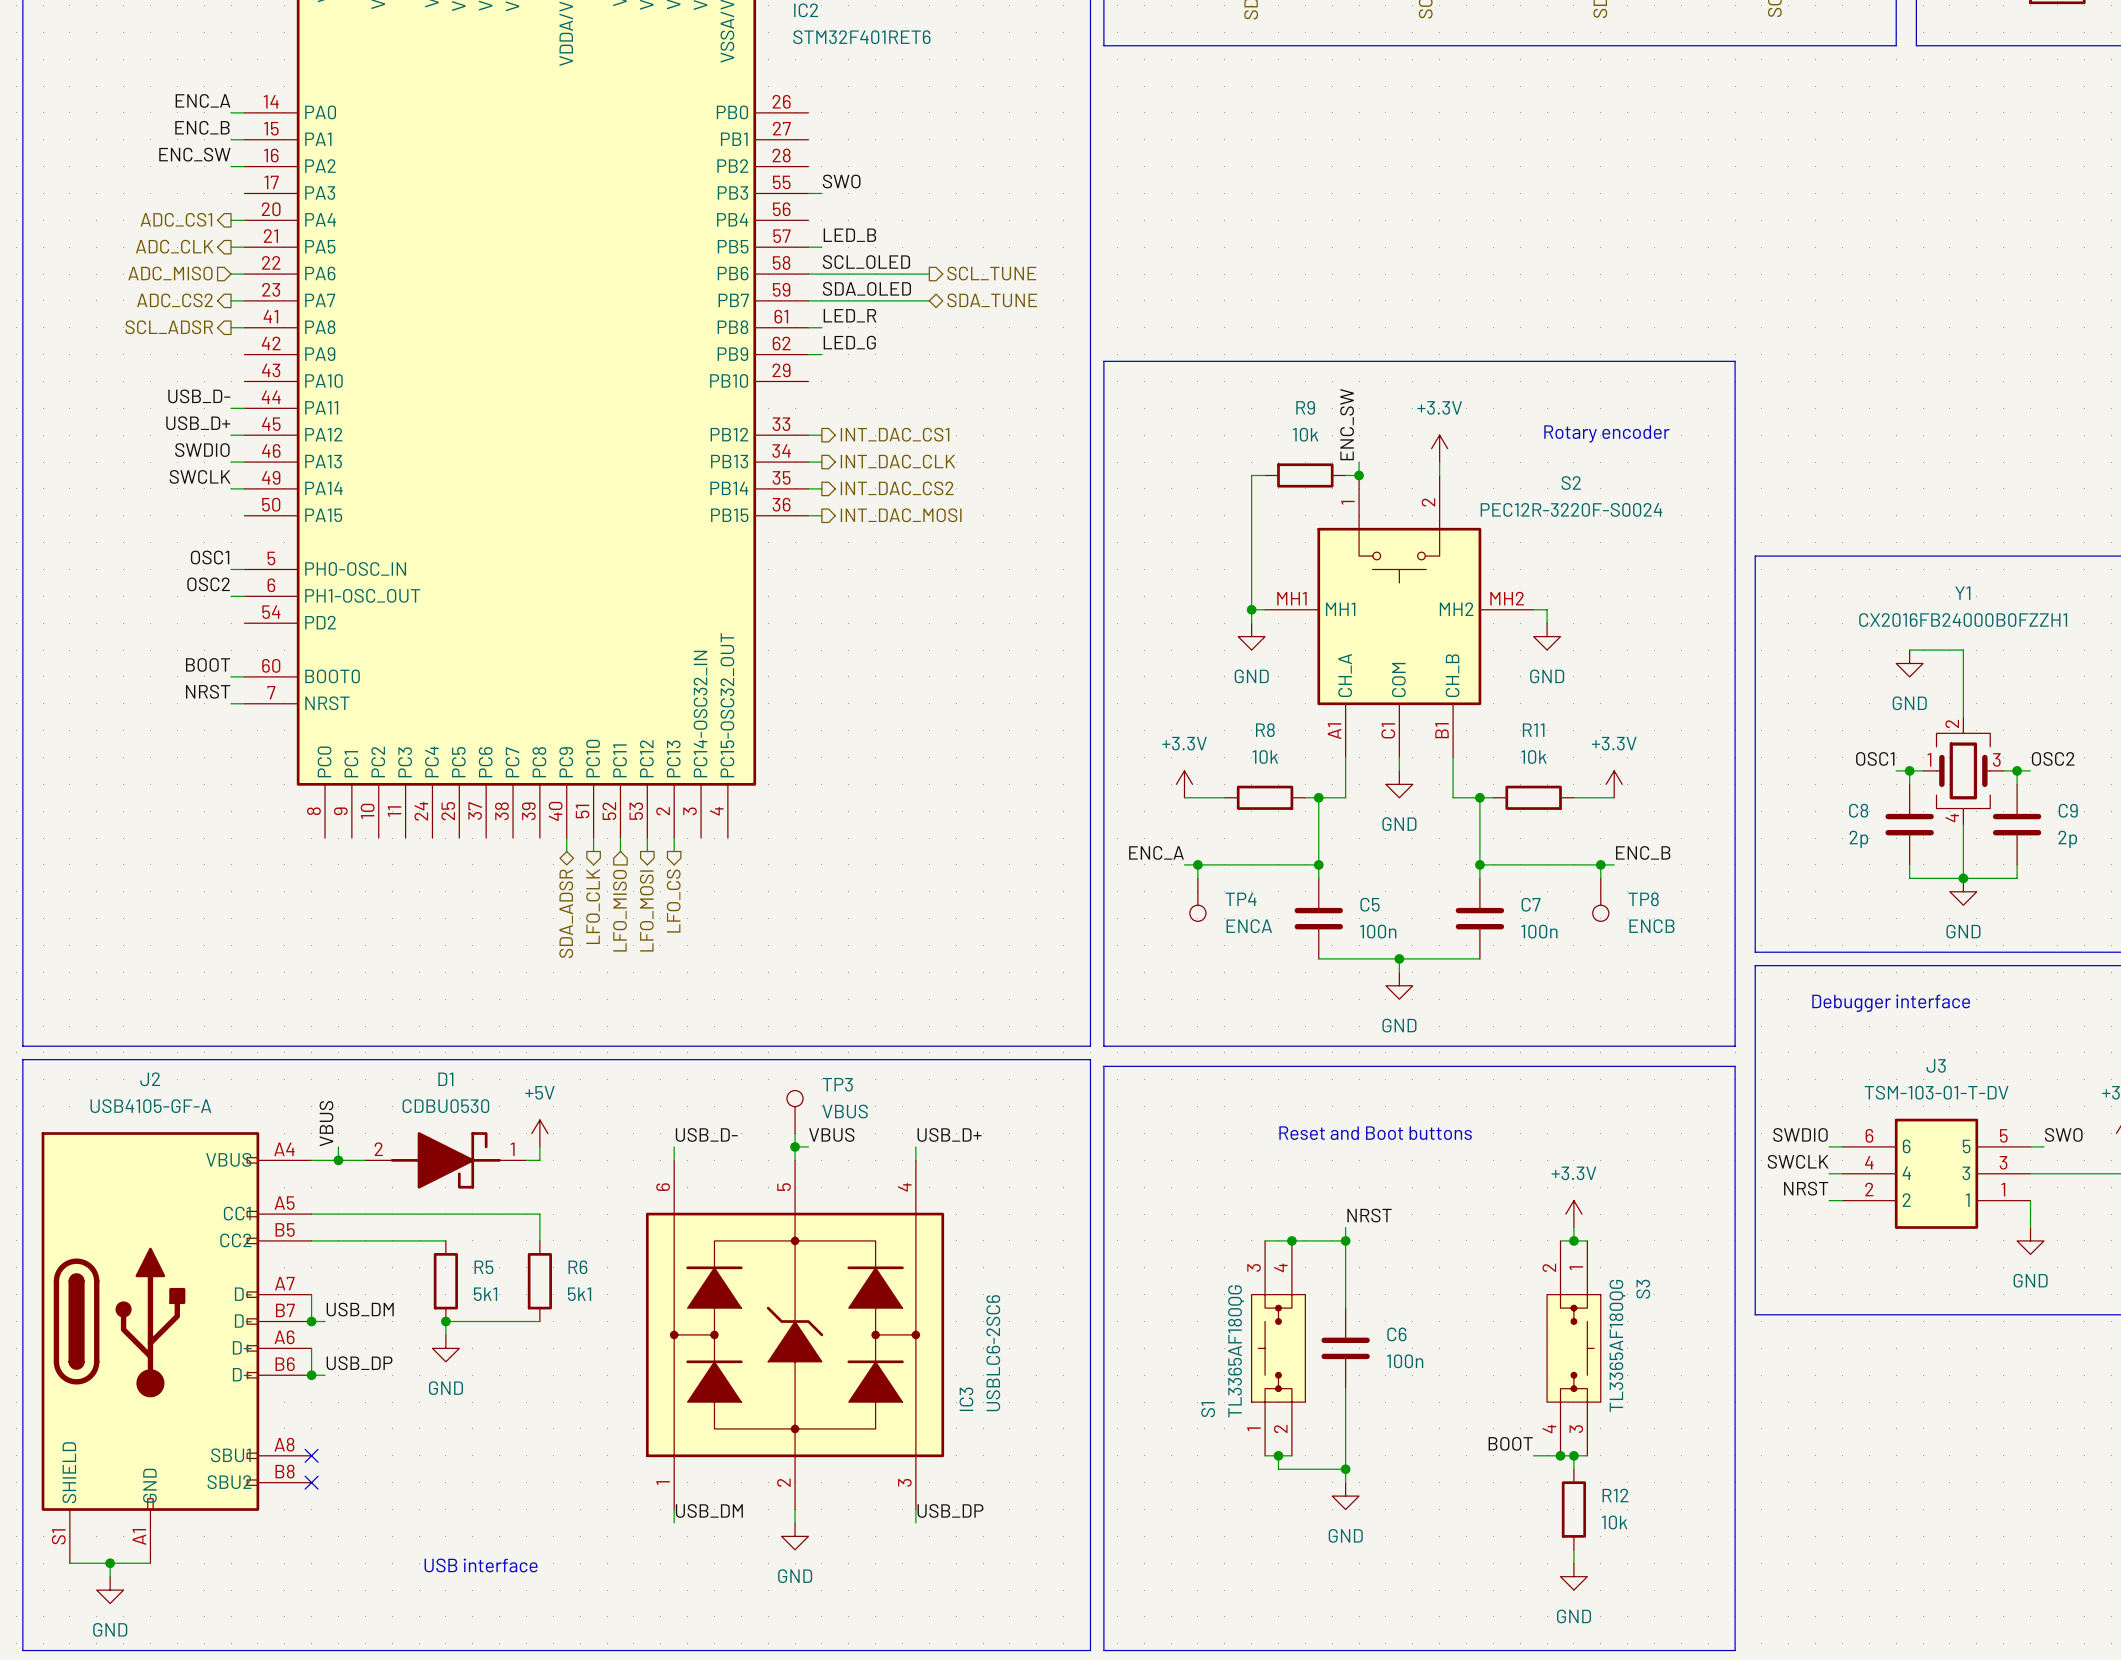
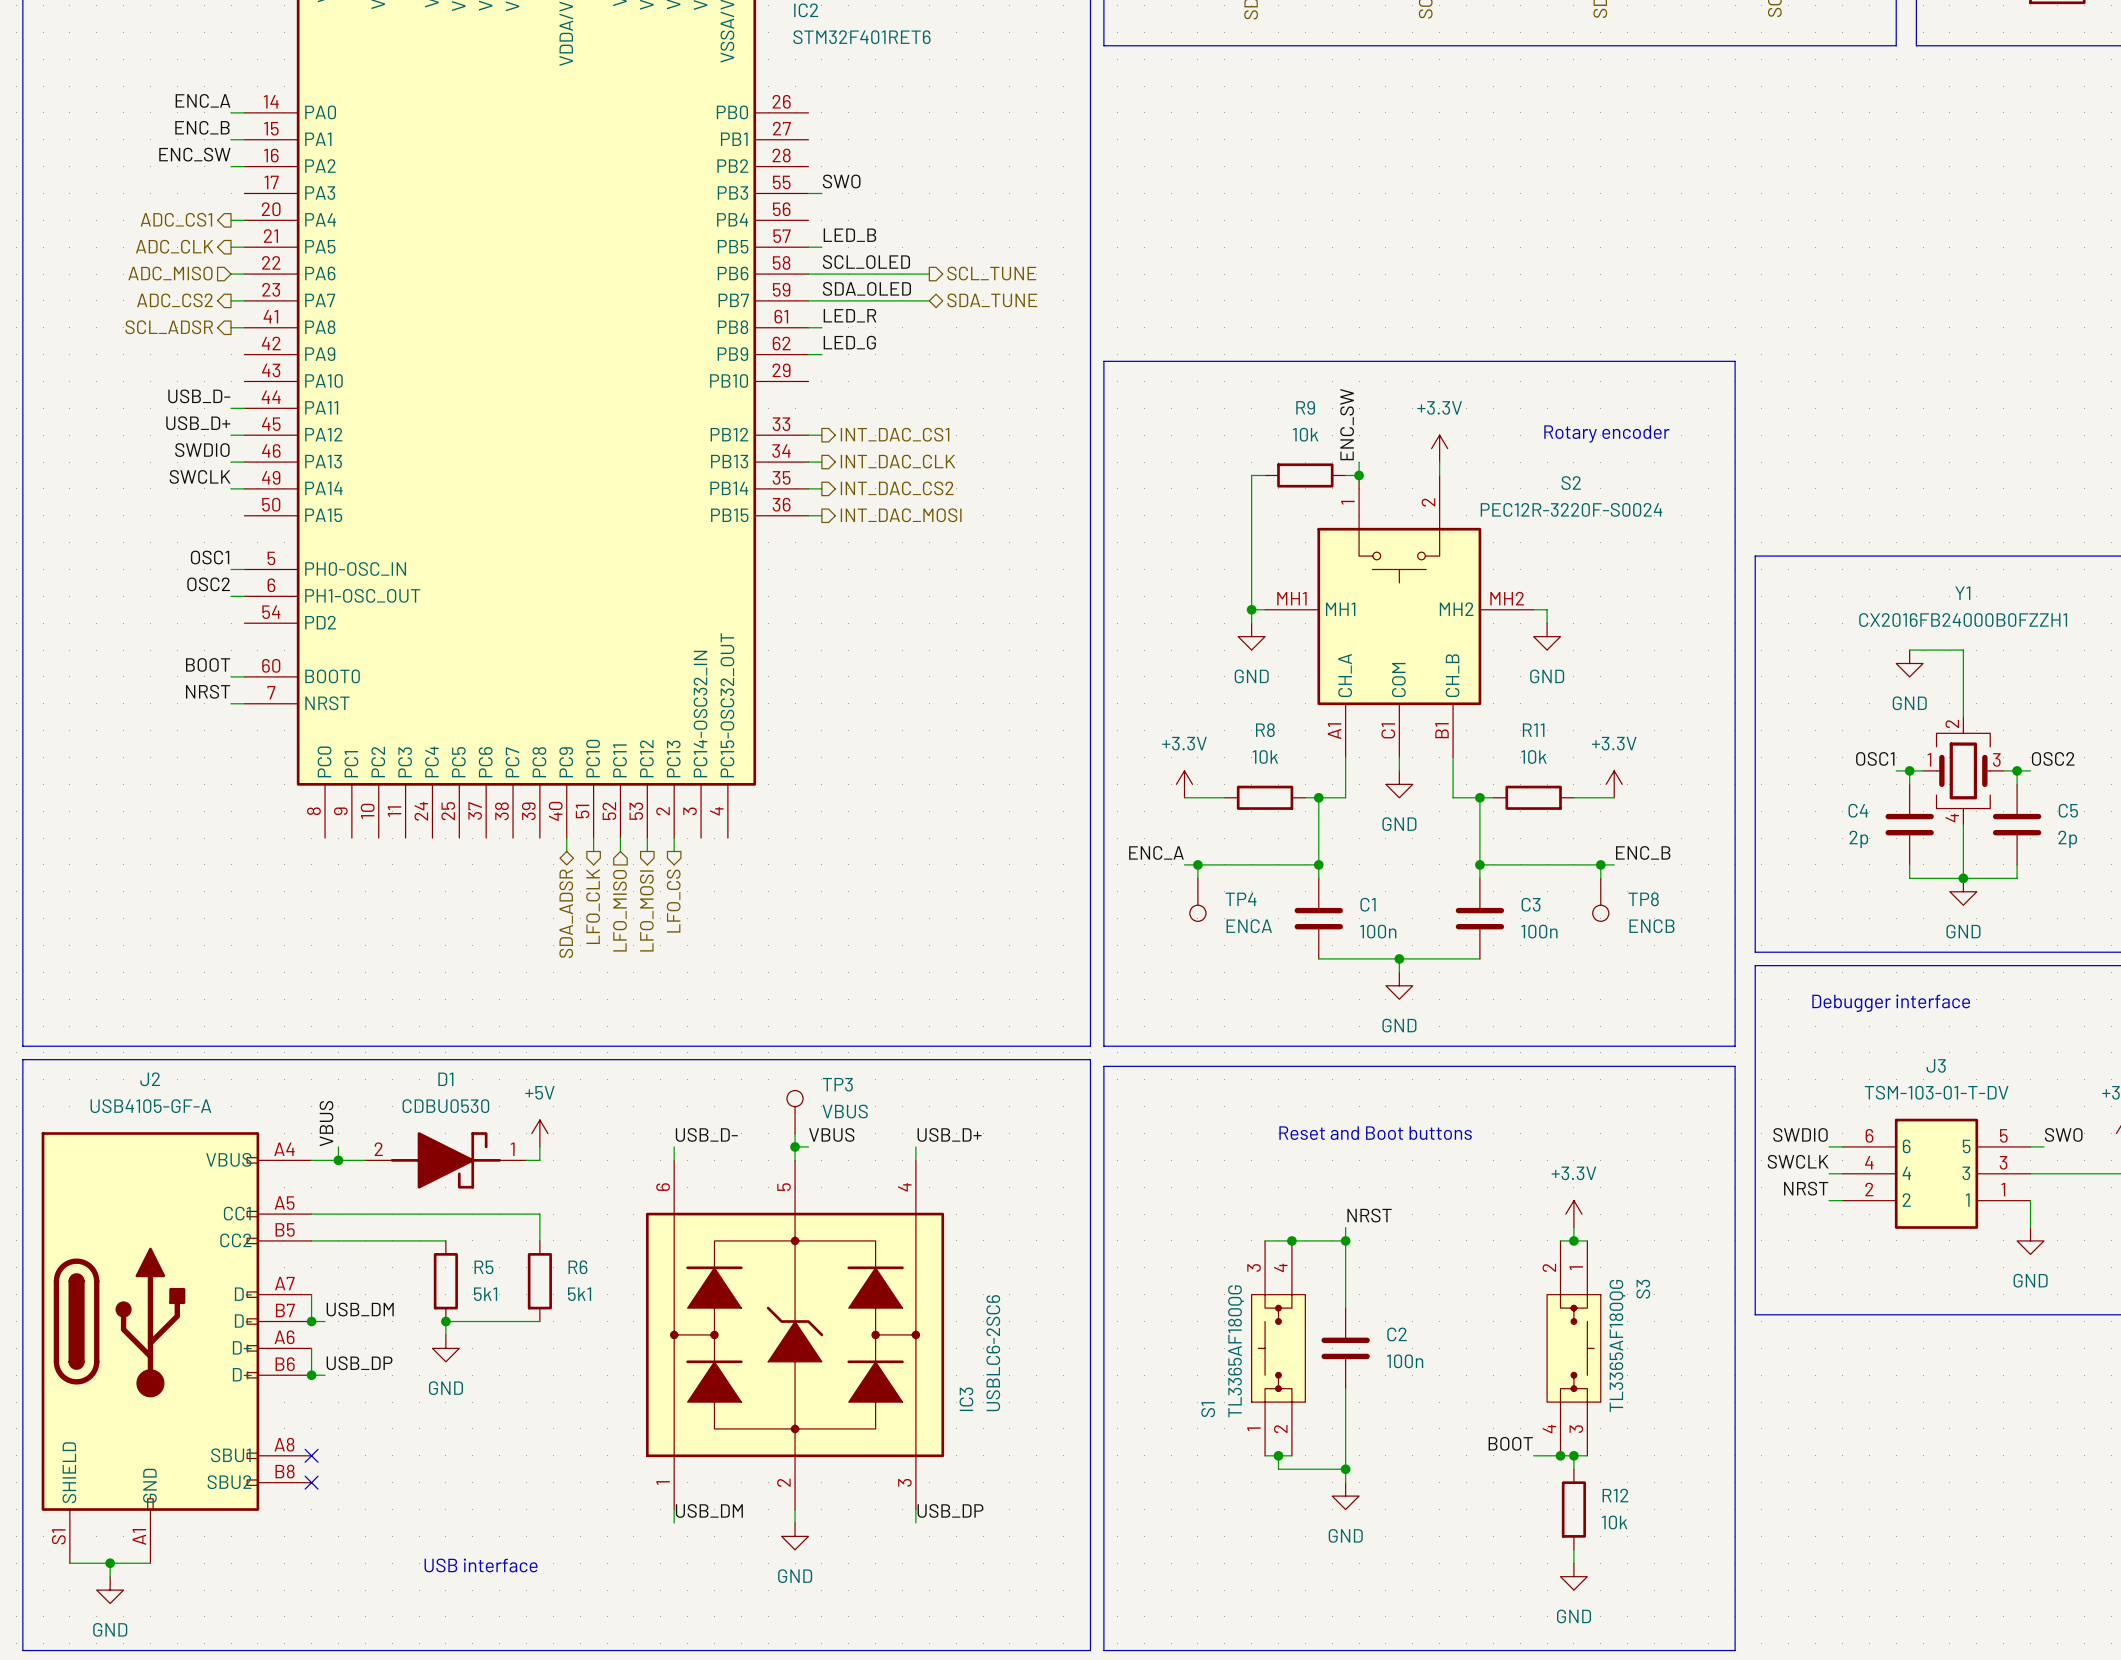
C8 name: C8 (1858, 810) -> C4 (1858, 810)
C9 name: C9 (2068, 810) -> C5 (2068, 810)
C5 name: C5 (1370, 904) -> C1 (1368, 904)
C7 name: C7 (1531, 904) -> C3 (1531, 904)
C6 name: C6 (1396, 1334) -> C2 (1397, 1334)

